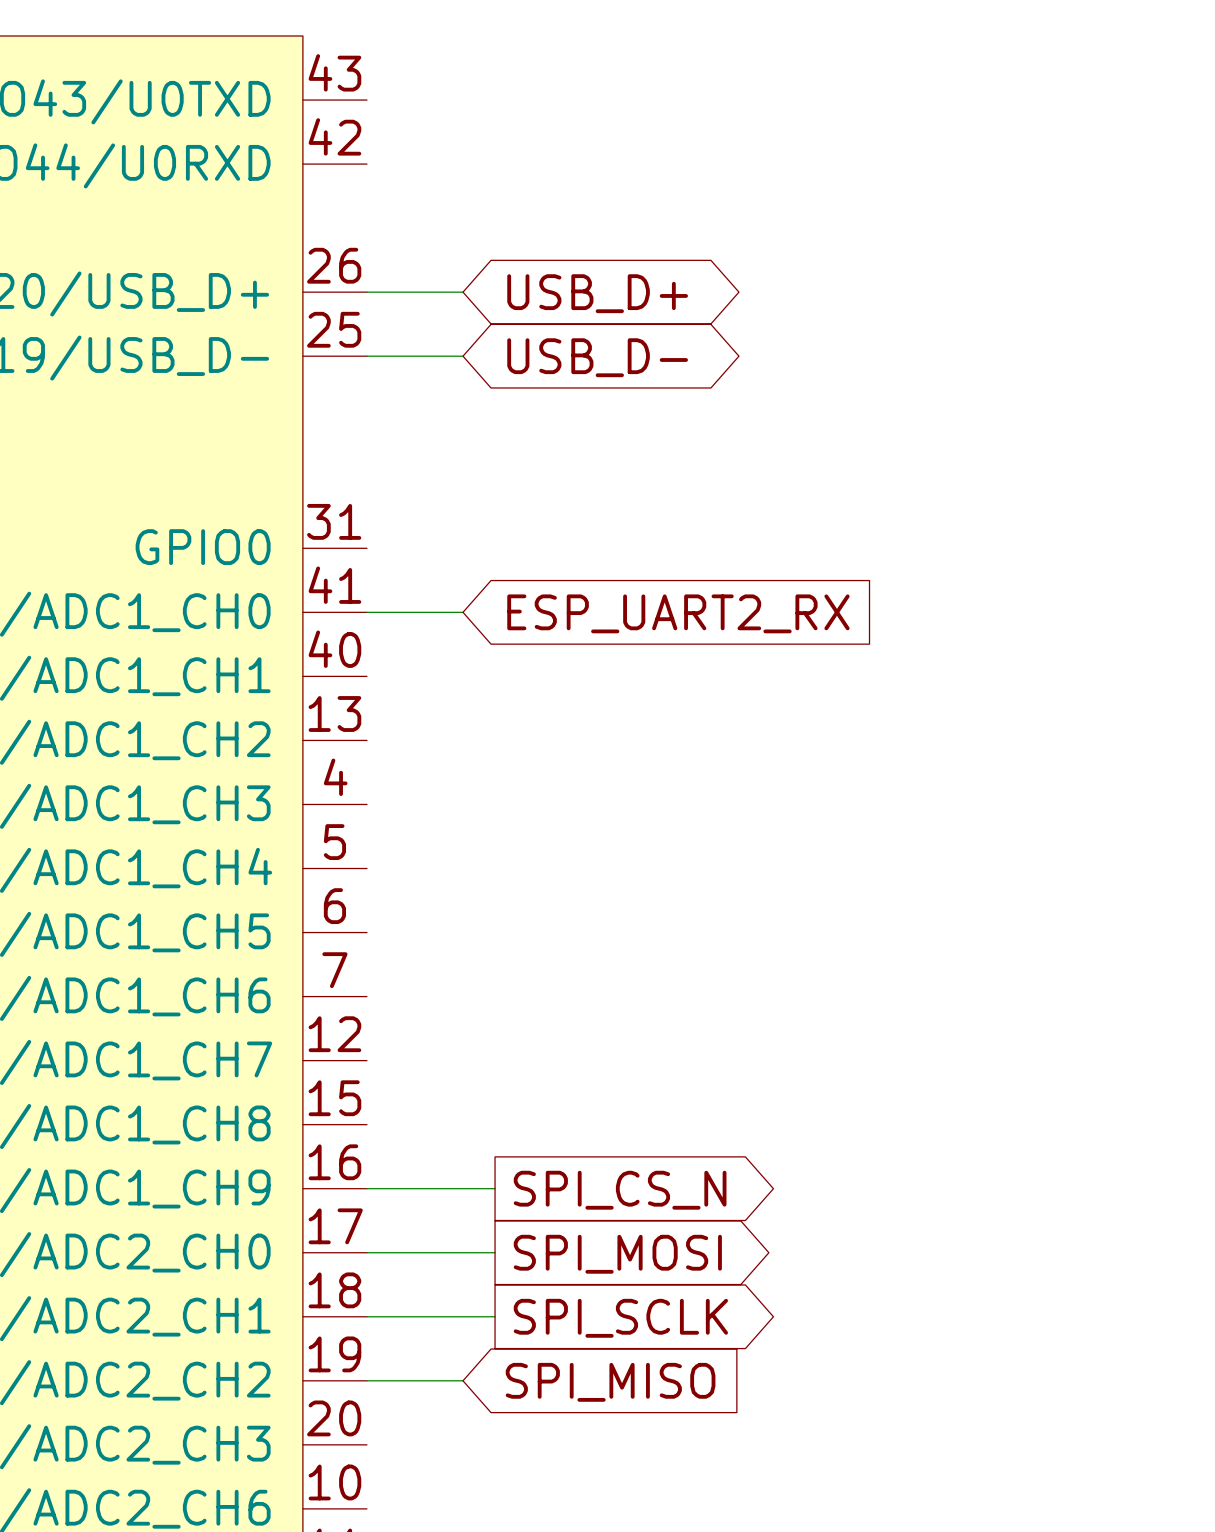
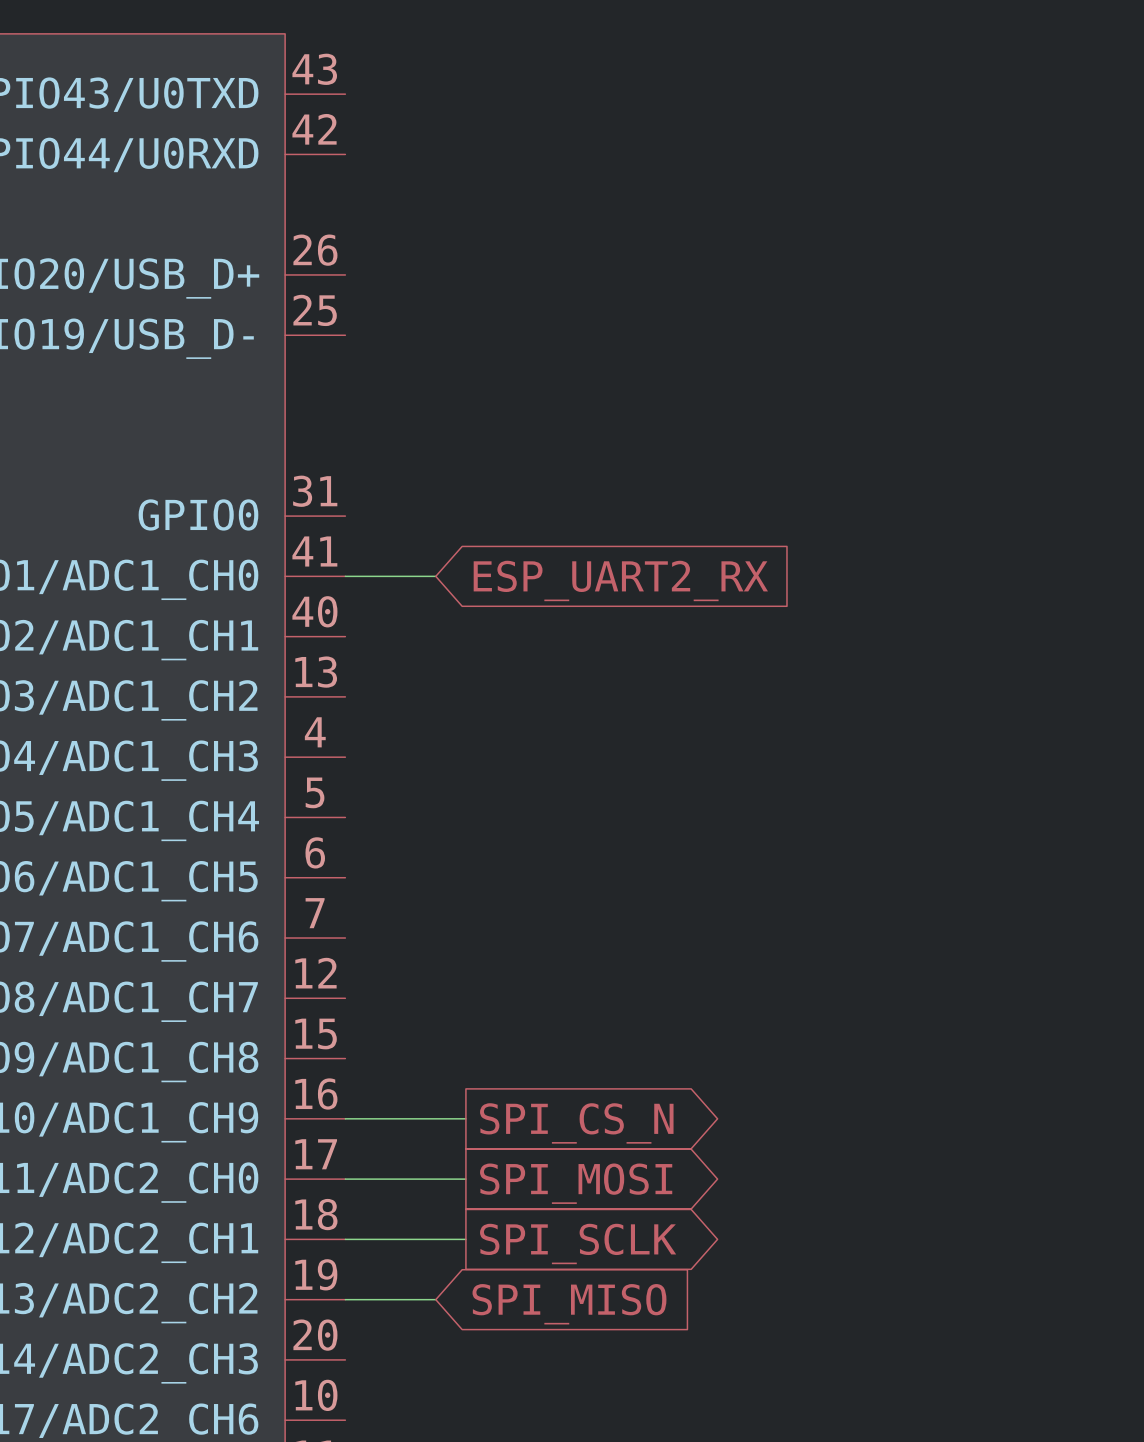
wire: (366, 292) (463, 292) -> none
global label: USB_D+ (597, 293) -> none
wire: (366, 356) (463, 356) -> none
global label: USB_D- (597, 357) -> none

